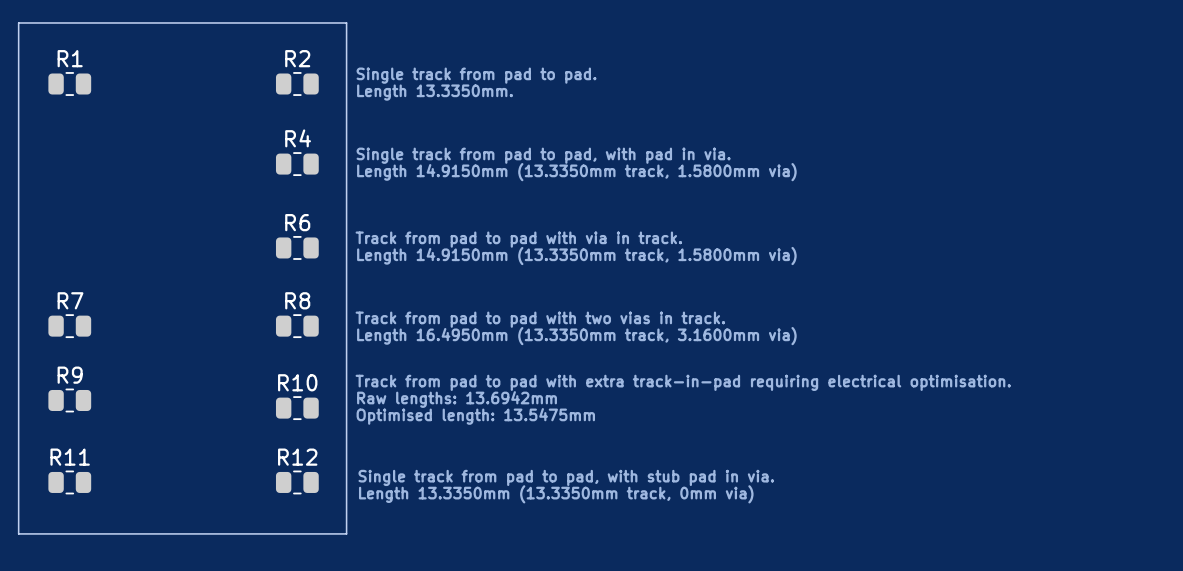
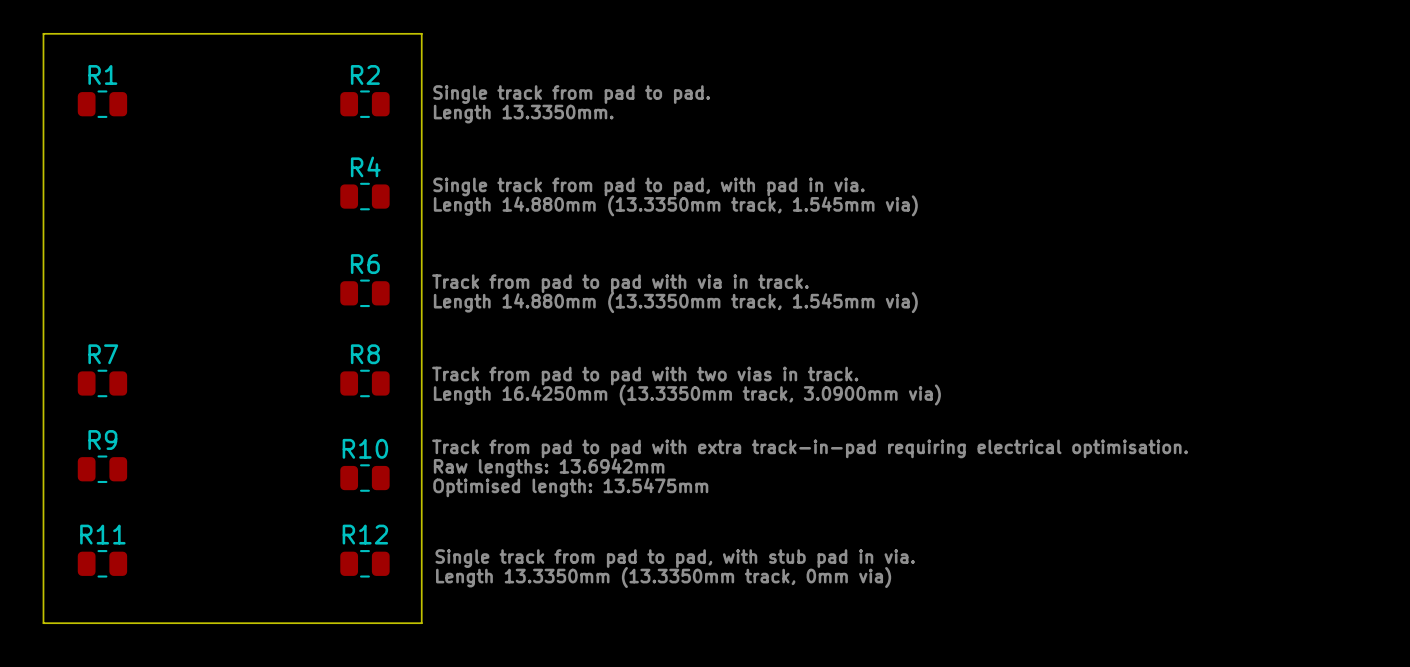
text: Length 14.9150mm (13.3350mm track, 1.5800mm via) (576, 172) -> Length 14.880mm (13.3350mm track, 1.545mm via) (675, 205)
text: Length 14.9150mm (13.3350mm track, 1.5800mm via) (576, 256) -> Length 14.880mm (13.3350mm track, 1.545mm via) (675, 302)
text: Length 16.4950mm (13.3350mm track, 3.1600mm via) (576, 336) -> Length 16.4250mm (13.3350mm track, 3.0900mm via) (687, 394)

